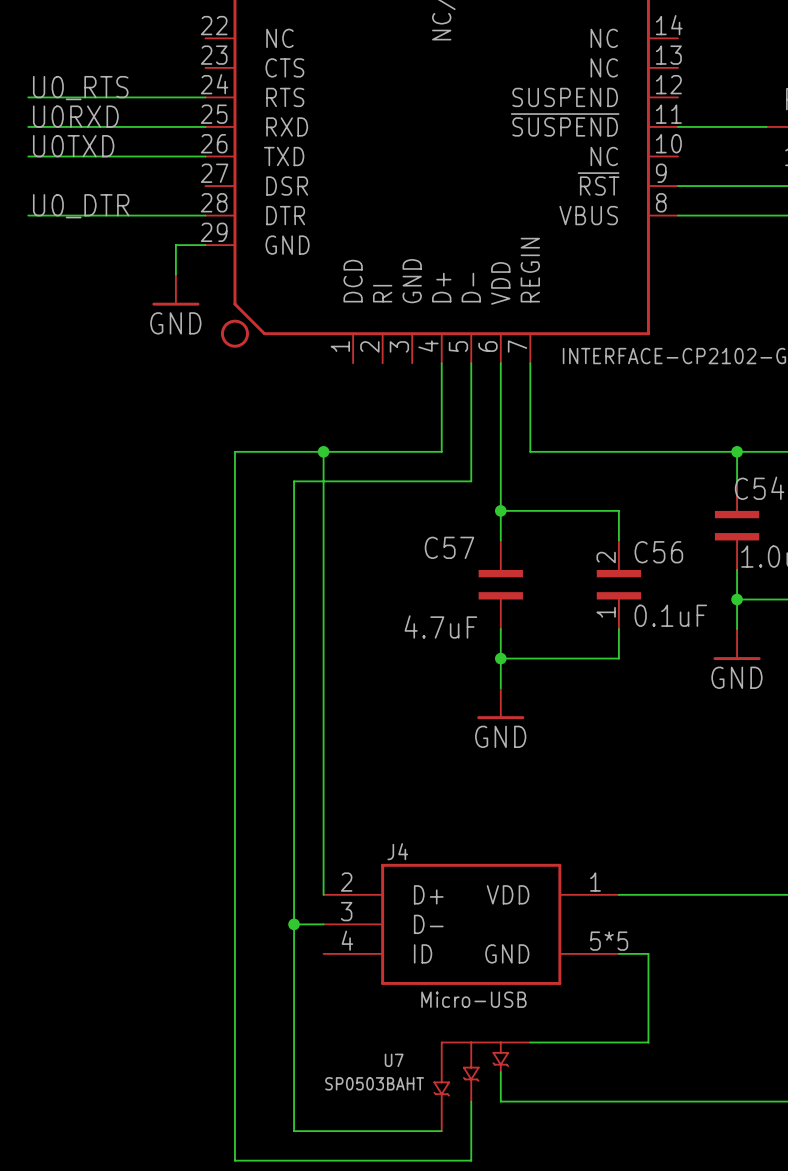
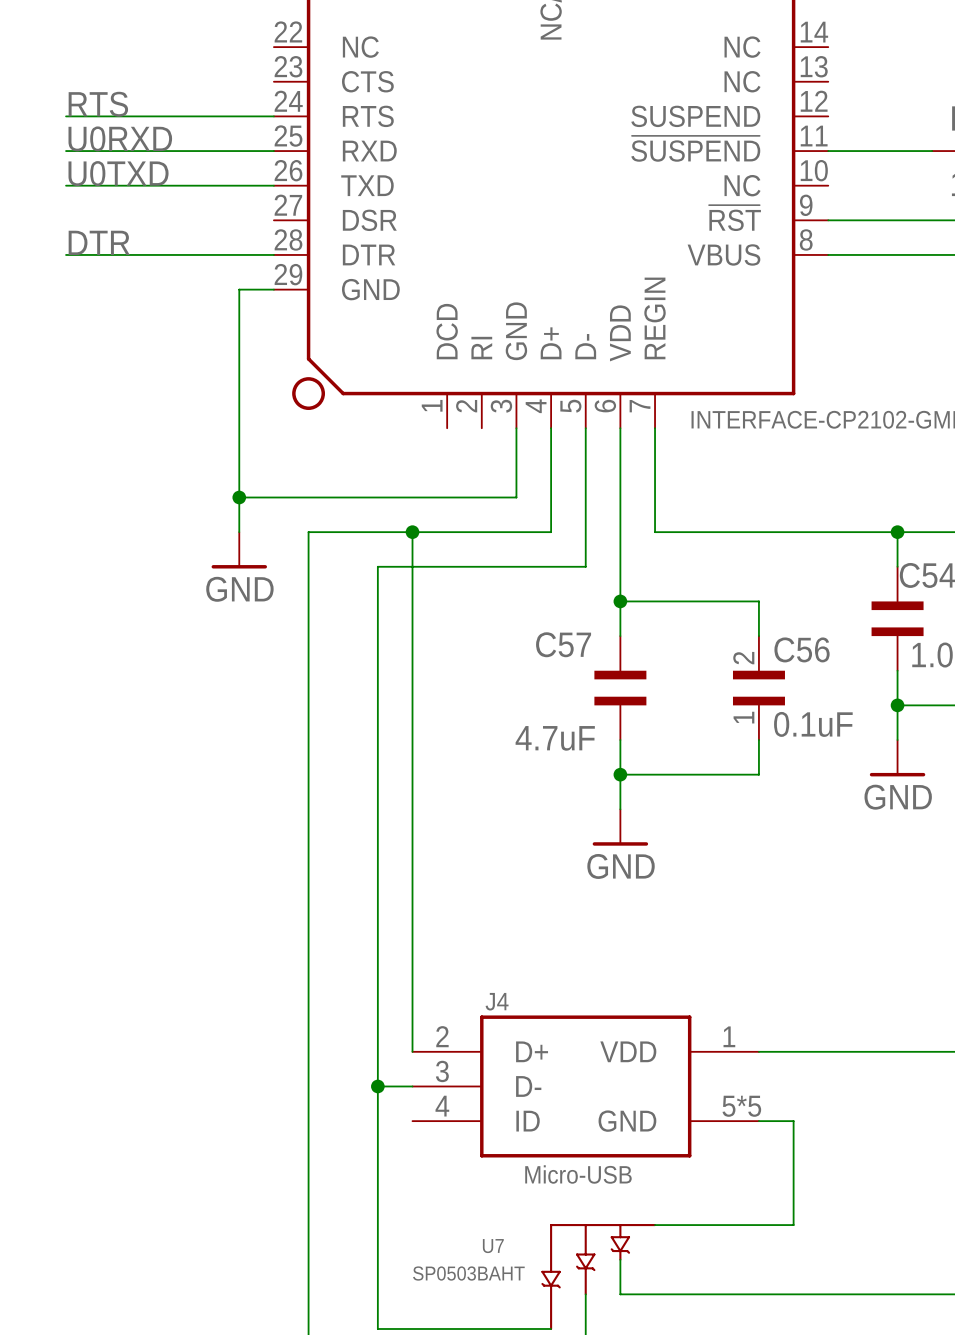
label: U0_RTS (80, 88) -> RTS (98, 104)
label: U0_DTR (81, 206) -> DTR (99, 242)
wire: none -> (239, 324) (239, 532)
power symbol position: GND (175, 290) -> GND (239, 550)
wire: none -> (516, 428) (516, 497) (239, 497)
junction: none -> (239, 497)

